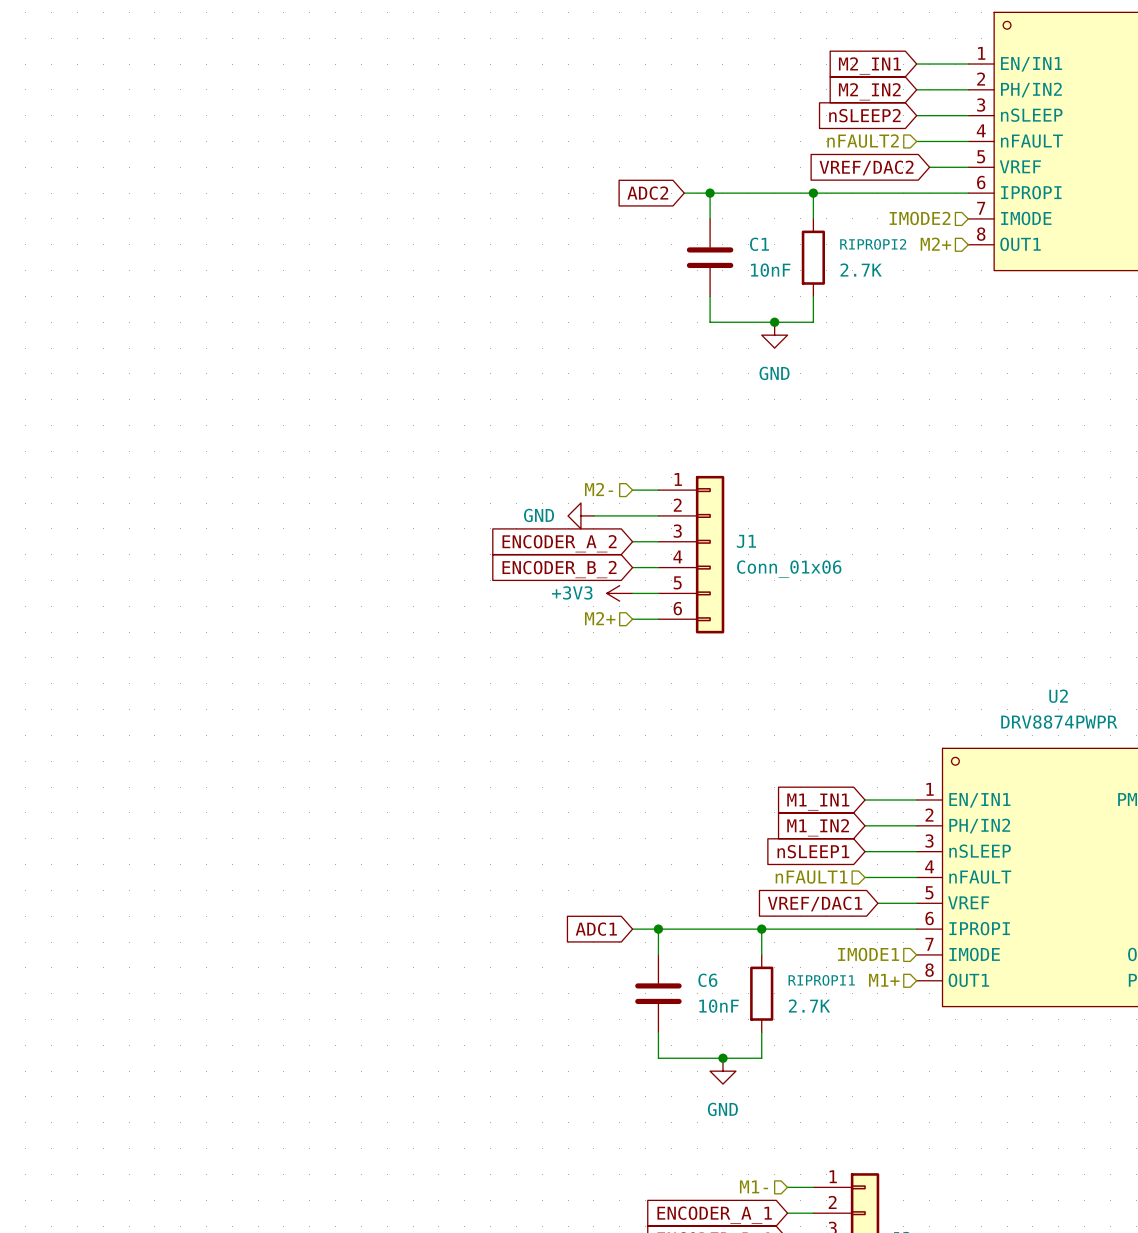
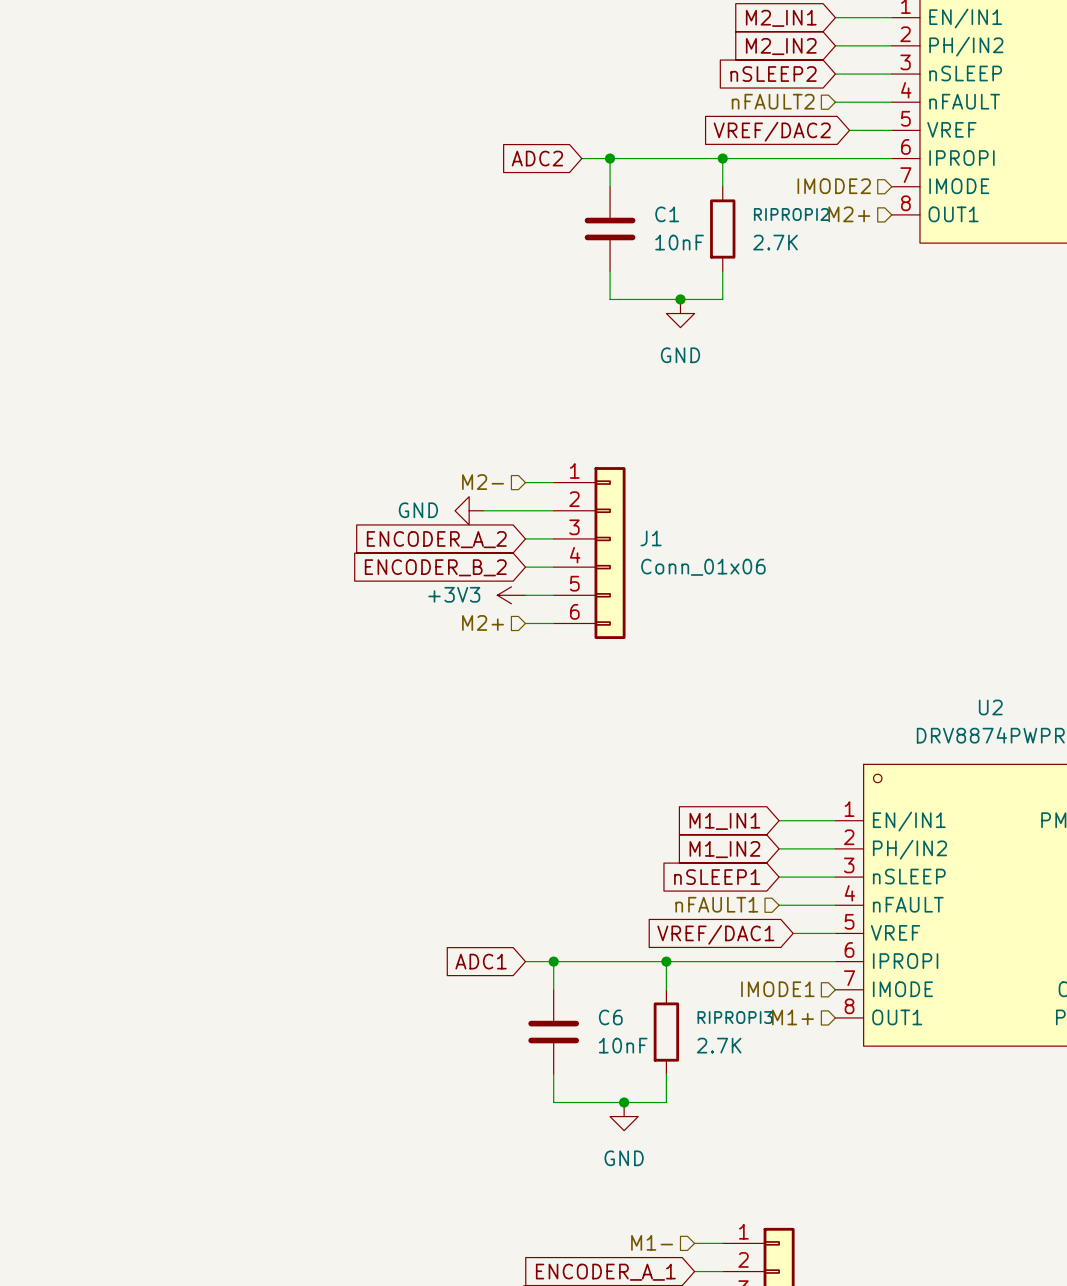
RIPROPI1 name: RIPROPI1 (821, 980) -> RIPROPI3 (735, 1017)

